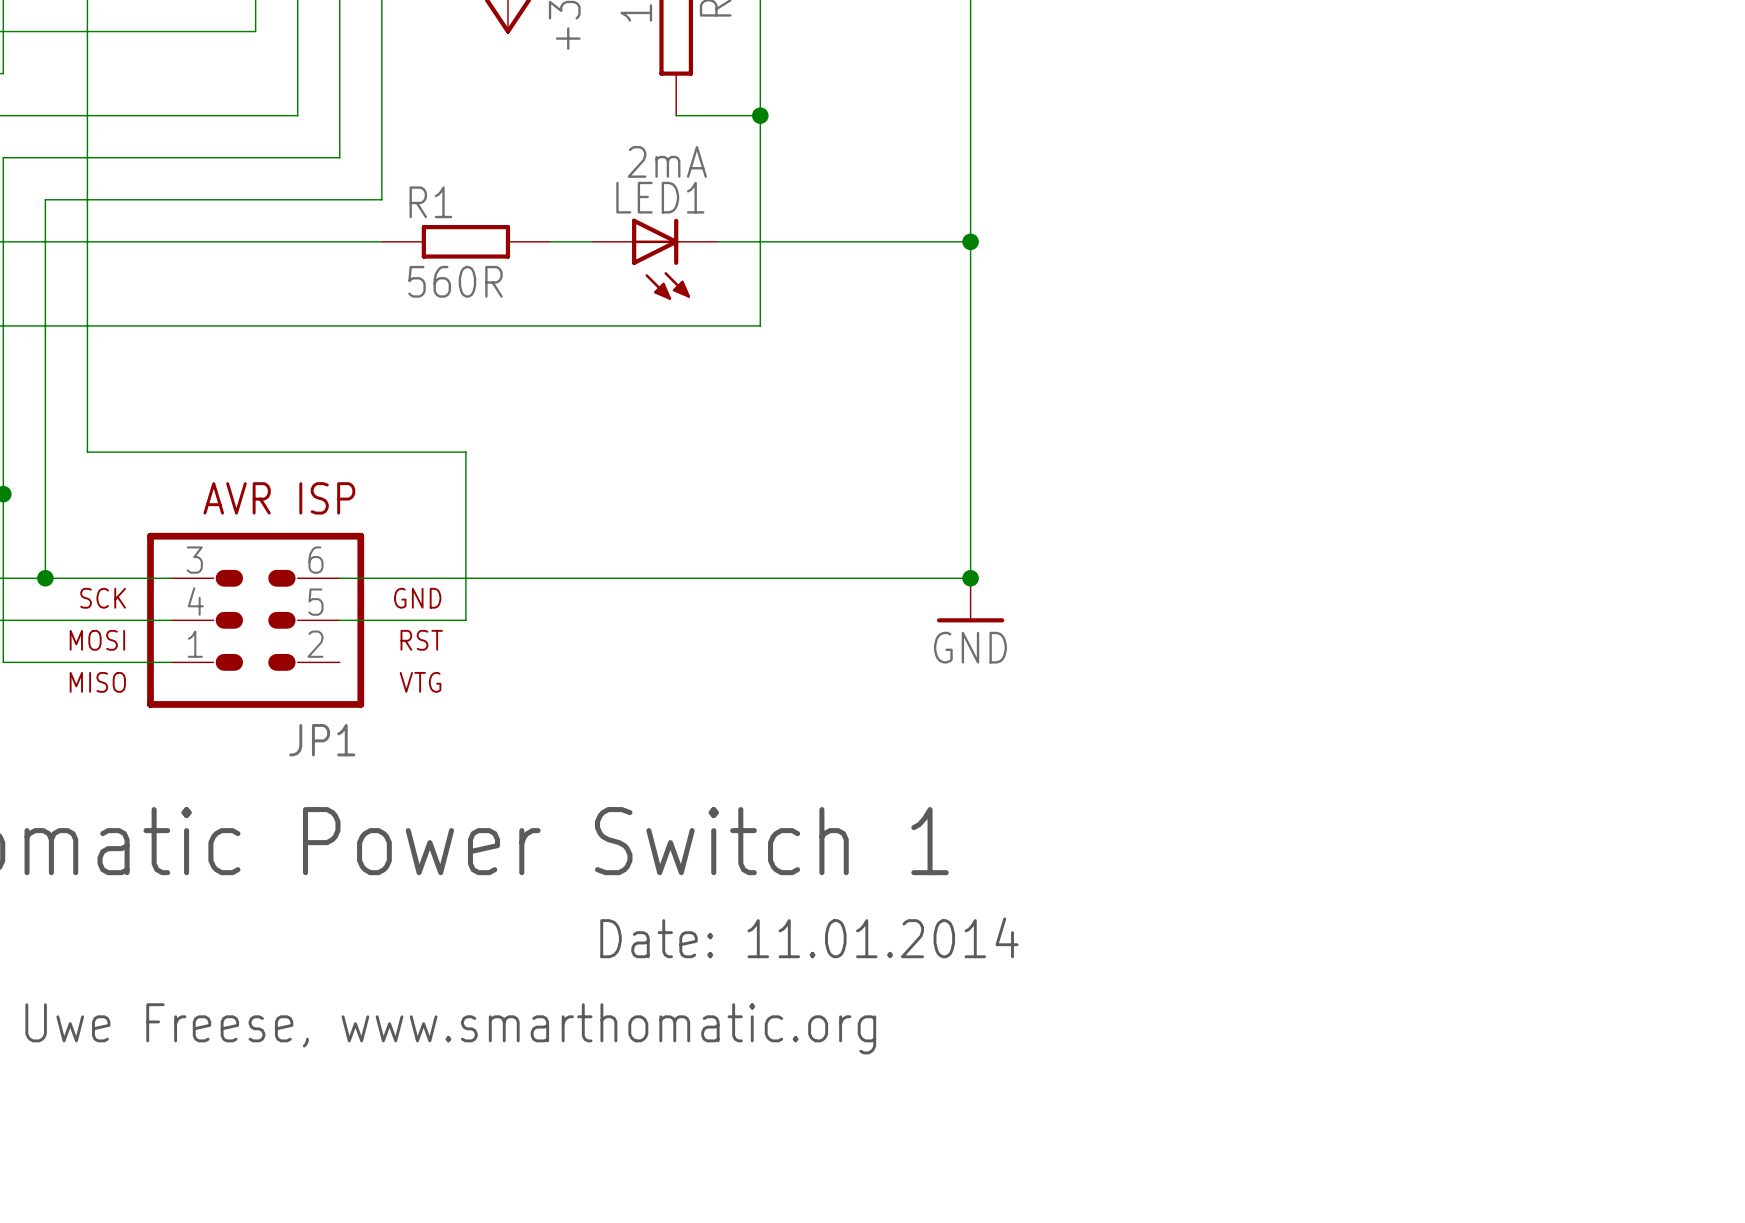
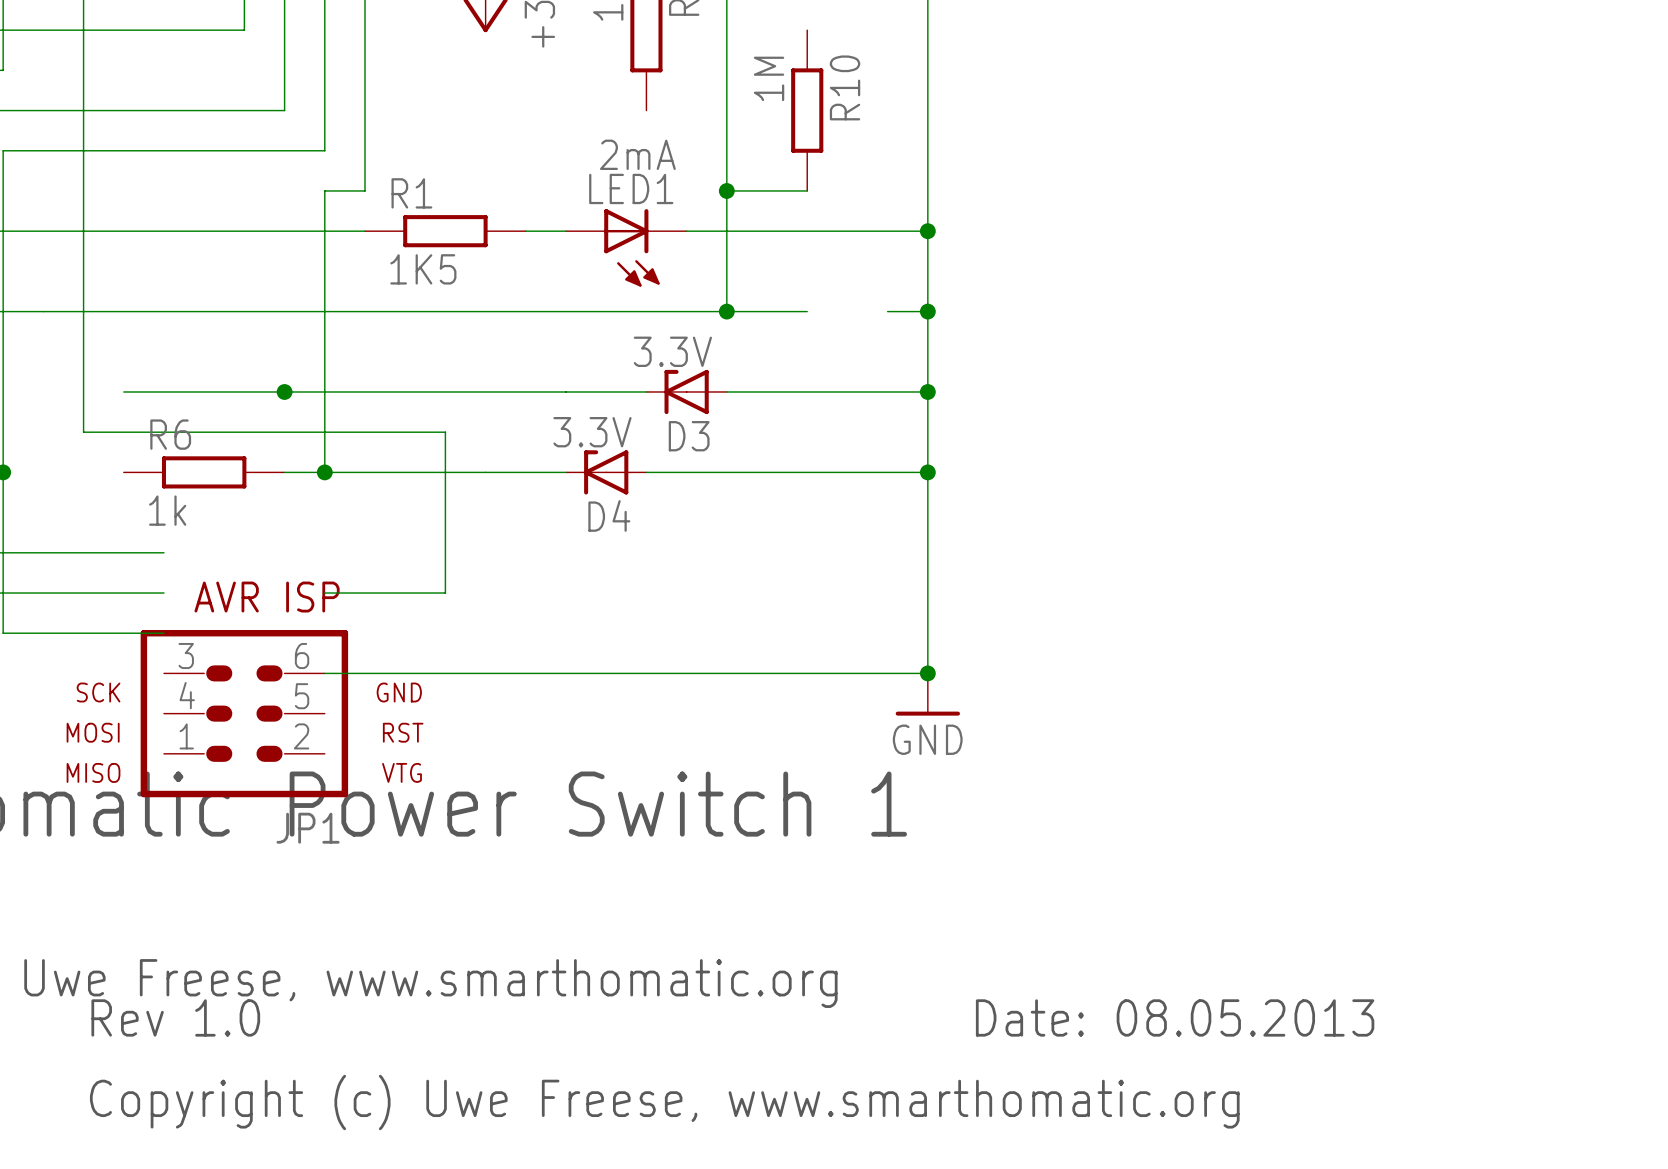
wire: (676, 115) (760, 115) -> (726, 190) (807, 190)
junction position: (760, 115) -> (726, 190)
R10: none -> 1M (807, 110)
wire: (339, 199) (45, 199) (45, 578) -> (324, 190) (324, 472)
R1 value: 560R (455, 281) -> 1K5 (423, 269)
wire: none -> (726, 311) (807, 311)
junction: none -> (726, 311)
wire: none -> (887, 311) (927, 311)
junction: none -> (927, 311)
wire: none -> (123, 391) (646, 391)
junction: none -> (284, 391)
D3: none -> 3.3V (686, 391)
wire: none -> (726, 391) (927, 391)
junction: none -> (927, 391)
R6: none -> 1k (204, 472)
wire: none -> (284, 472) (566, 472)
junction: none -> (324, 472)
D4: none -> 3.3V (606, 472)
wire: none -> (646, 472) (927, 472)
junction: none -> (927, 472)
junction: (45, 578) -> none
wire: (339, 578) (970, 578) -> (324, 673) (927, 673) (927, 552)
junction: (970, 578) -> none
power symbol position: GND (970, 600) -> GND (927, 694)
JP1 position: (255, 620) -> (244, 713)
junction: none -> (927, 673)
text: Date: 11.01.2014 (809, 937) -> none
text: none -> Rev 1.0 (175, 1017)
text: none -> Date: 08.05.2013 (1175, 1017)
text: none -> Copyright (c) Uwe Freese, www.smarthomatic.org (664, 1102)

